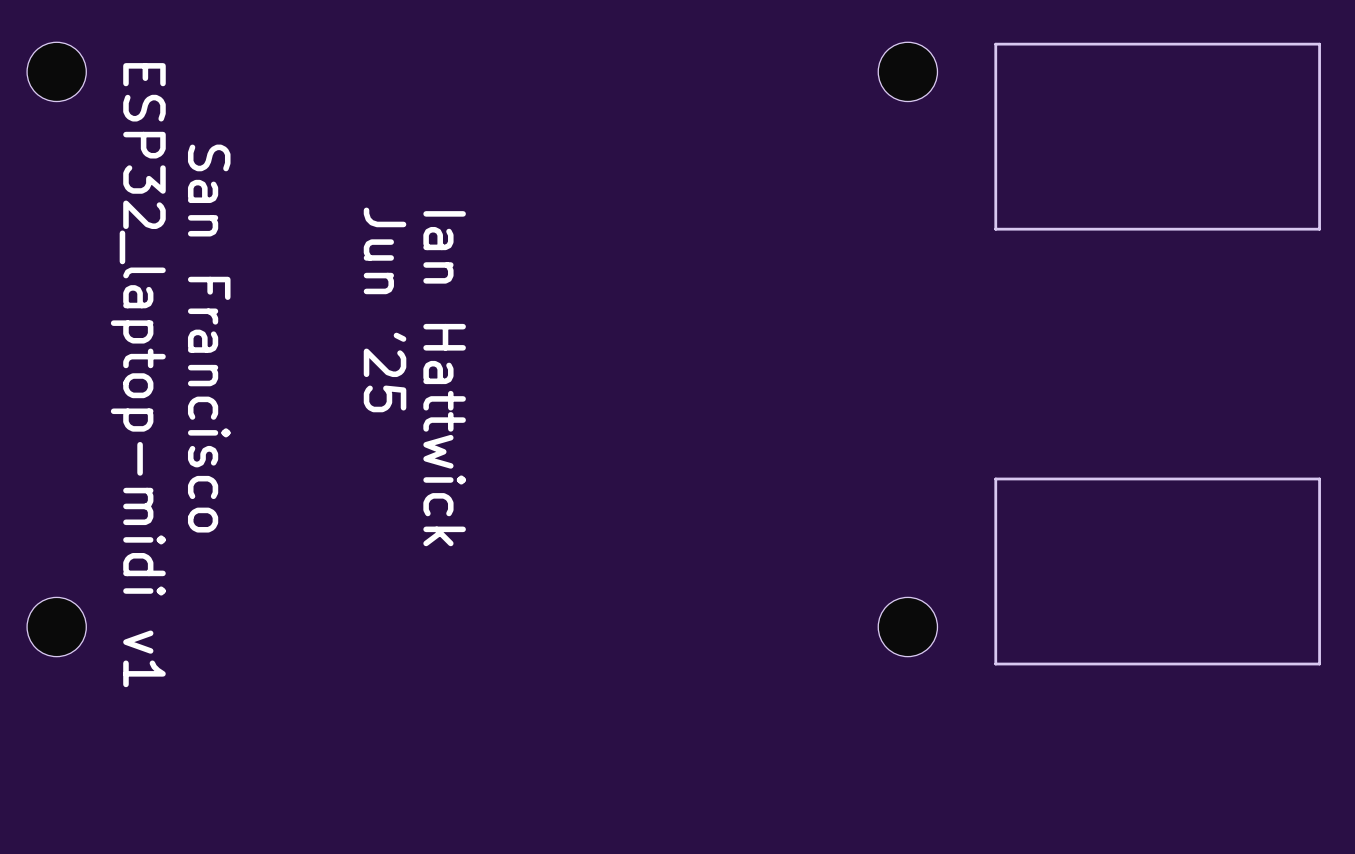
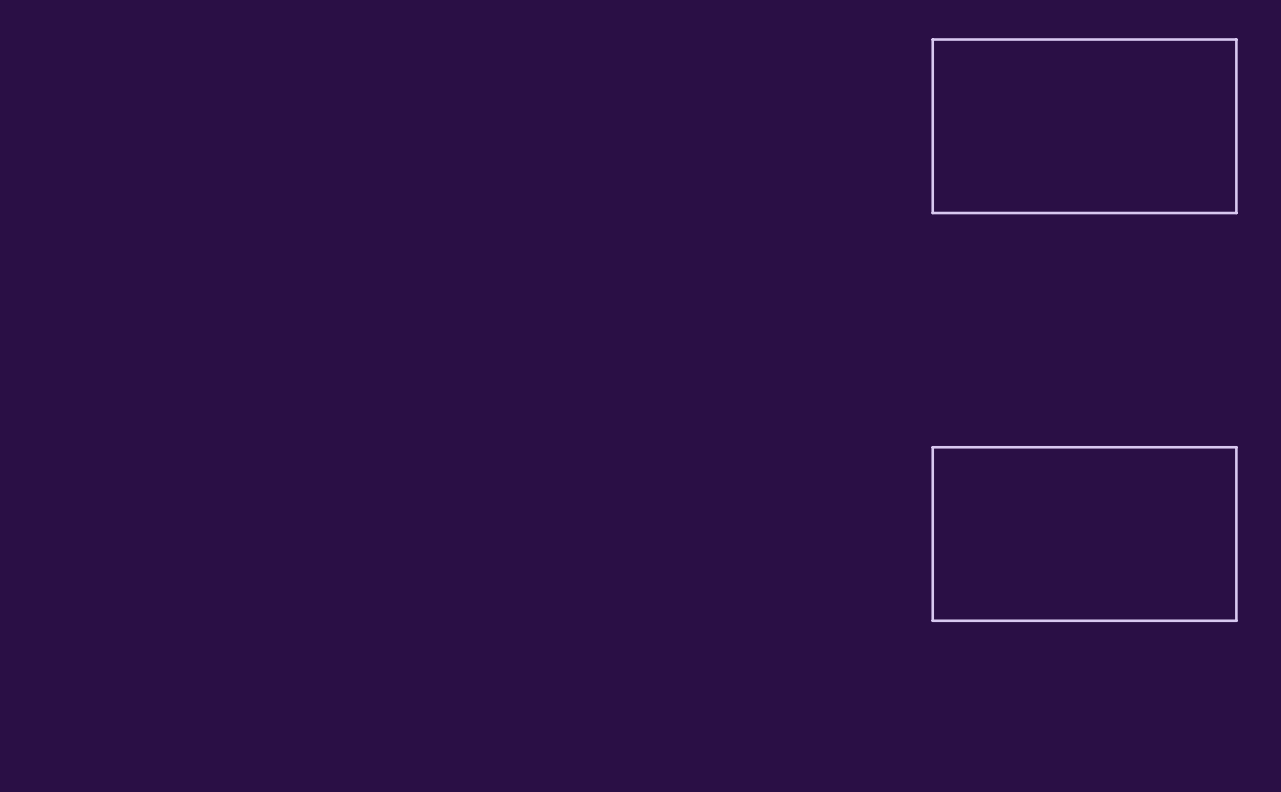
part: (56, 71) -> none
part: (907, 71) -> none
text: Jun '25 (385, 309) -> none
text: San Francisco (209, 338) -> none
text: ESP32_laptop-midi v1 (138, 375) -> none
text: Ian Hattwick (444, 378) -> none
part: (56, 627) -> none
part: (907, 627) -> none

